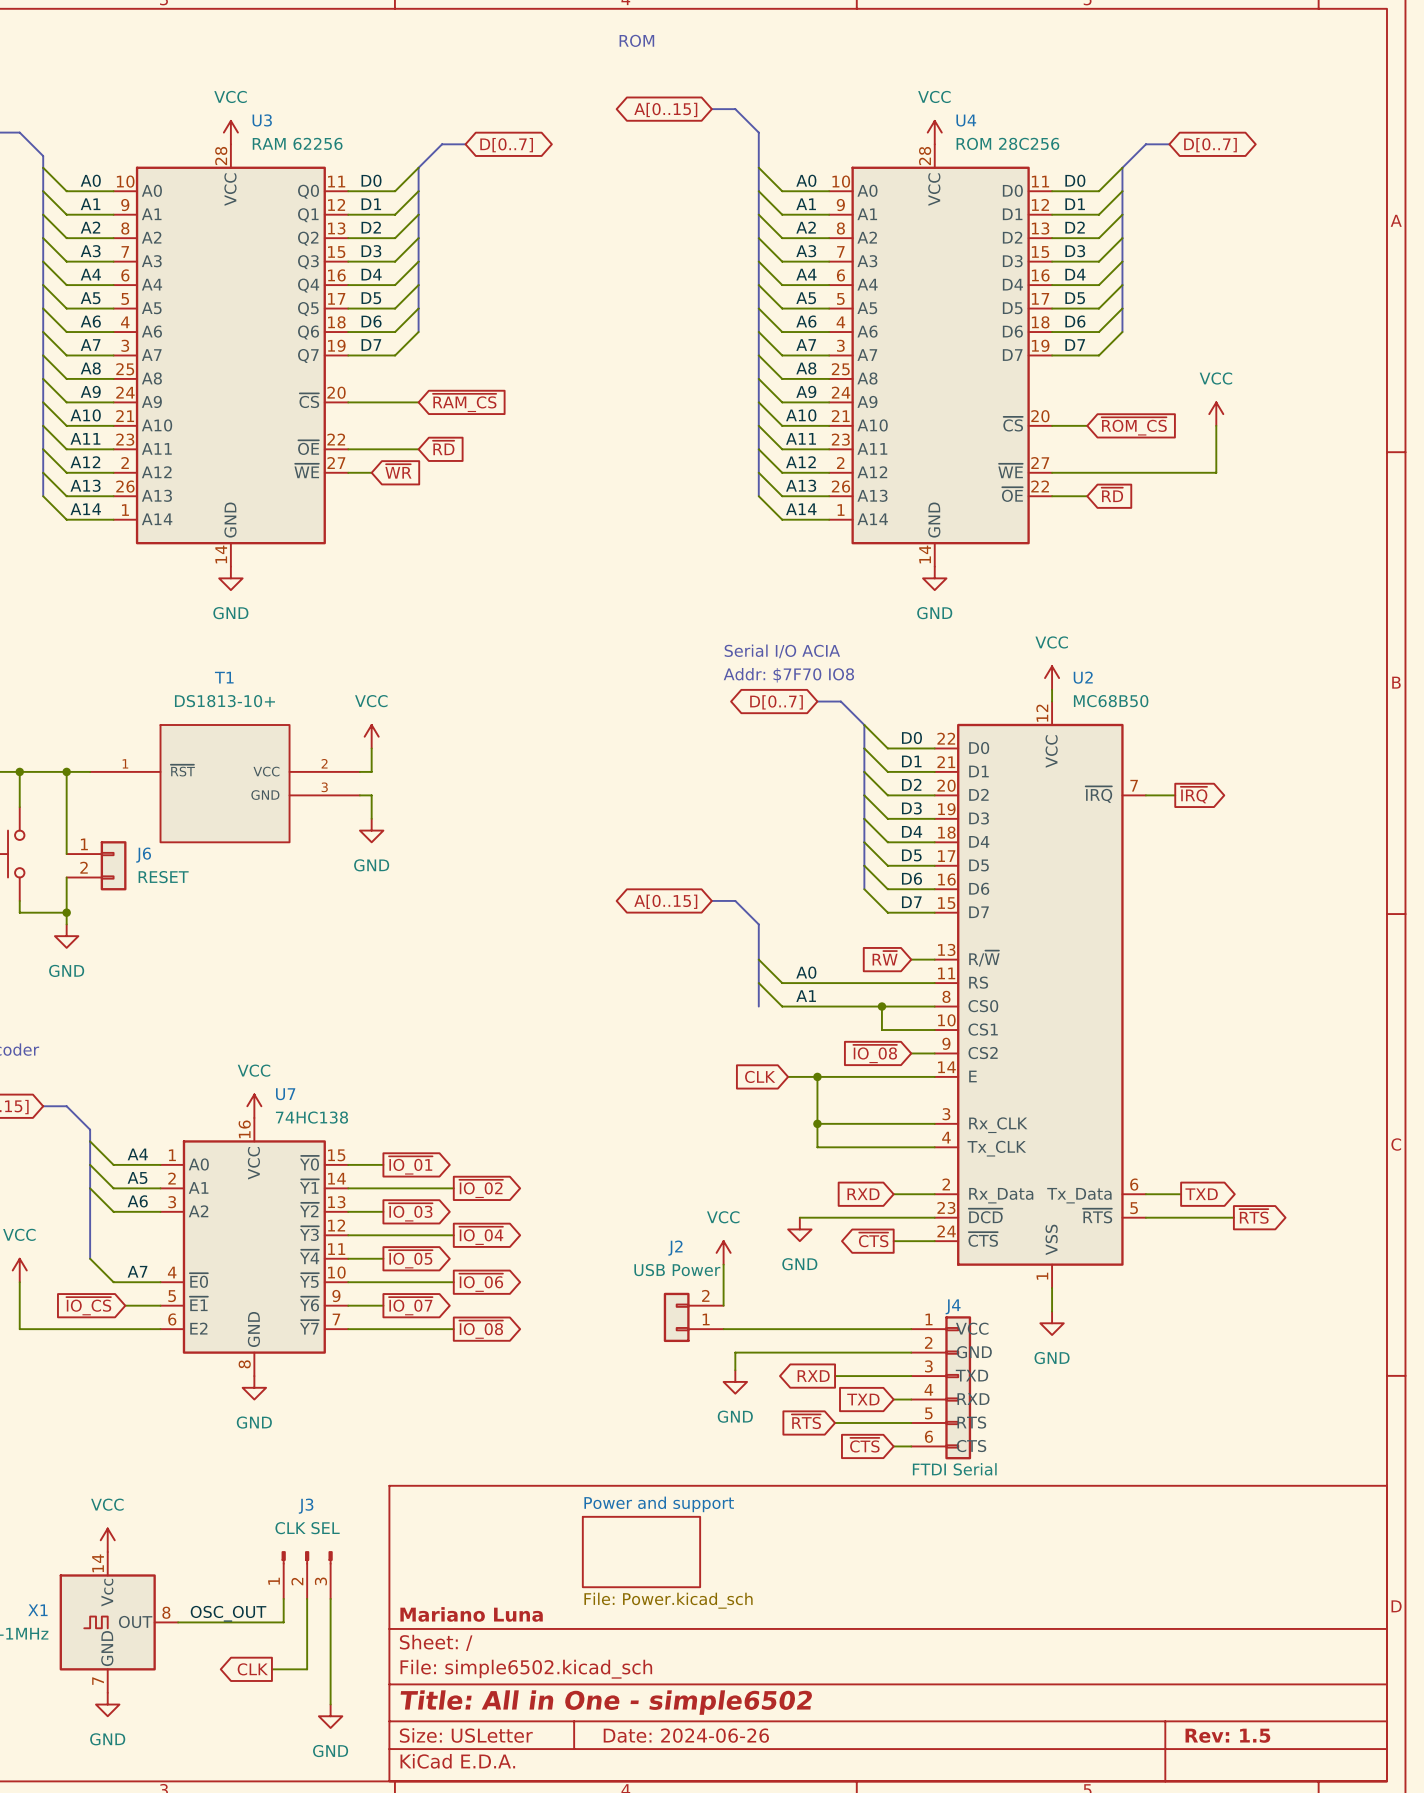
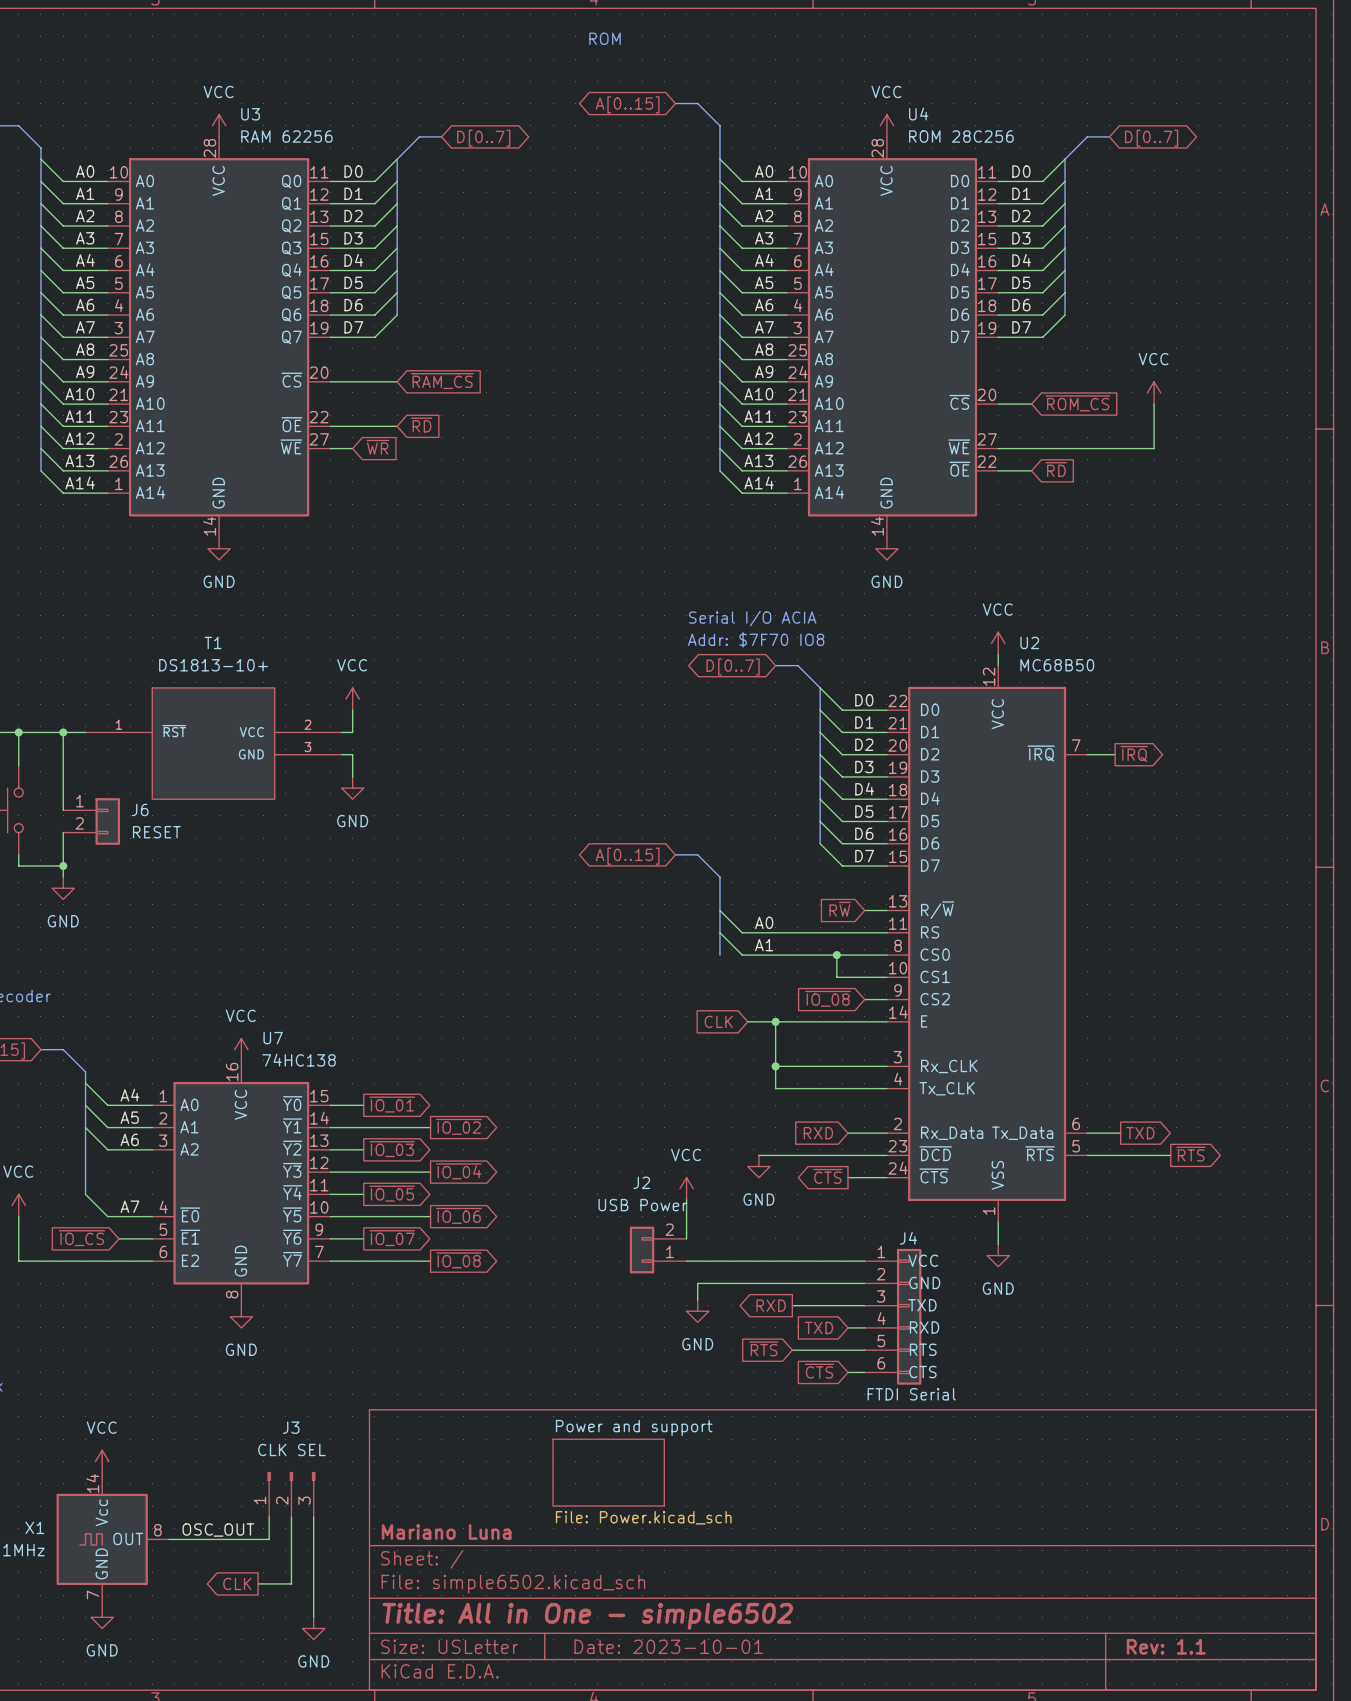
title block: Date: 2024-06-26 (686, 1735) -> Date: 2023-10-01 (668, 1646)
title block: Rev: 1.5 (1227, 1735) -> Rev: 1.1 (1166, 1646)

